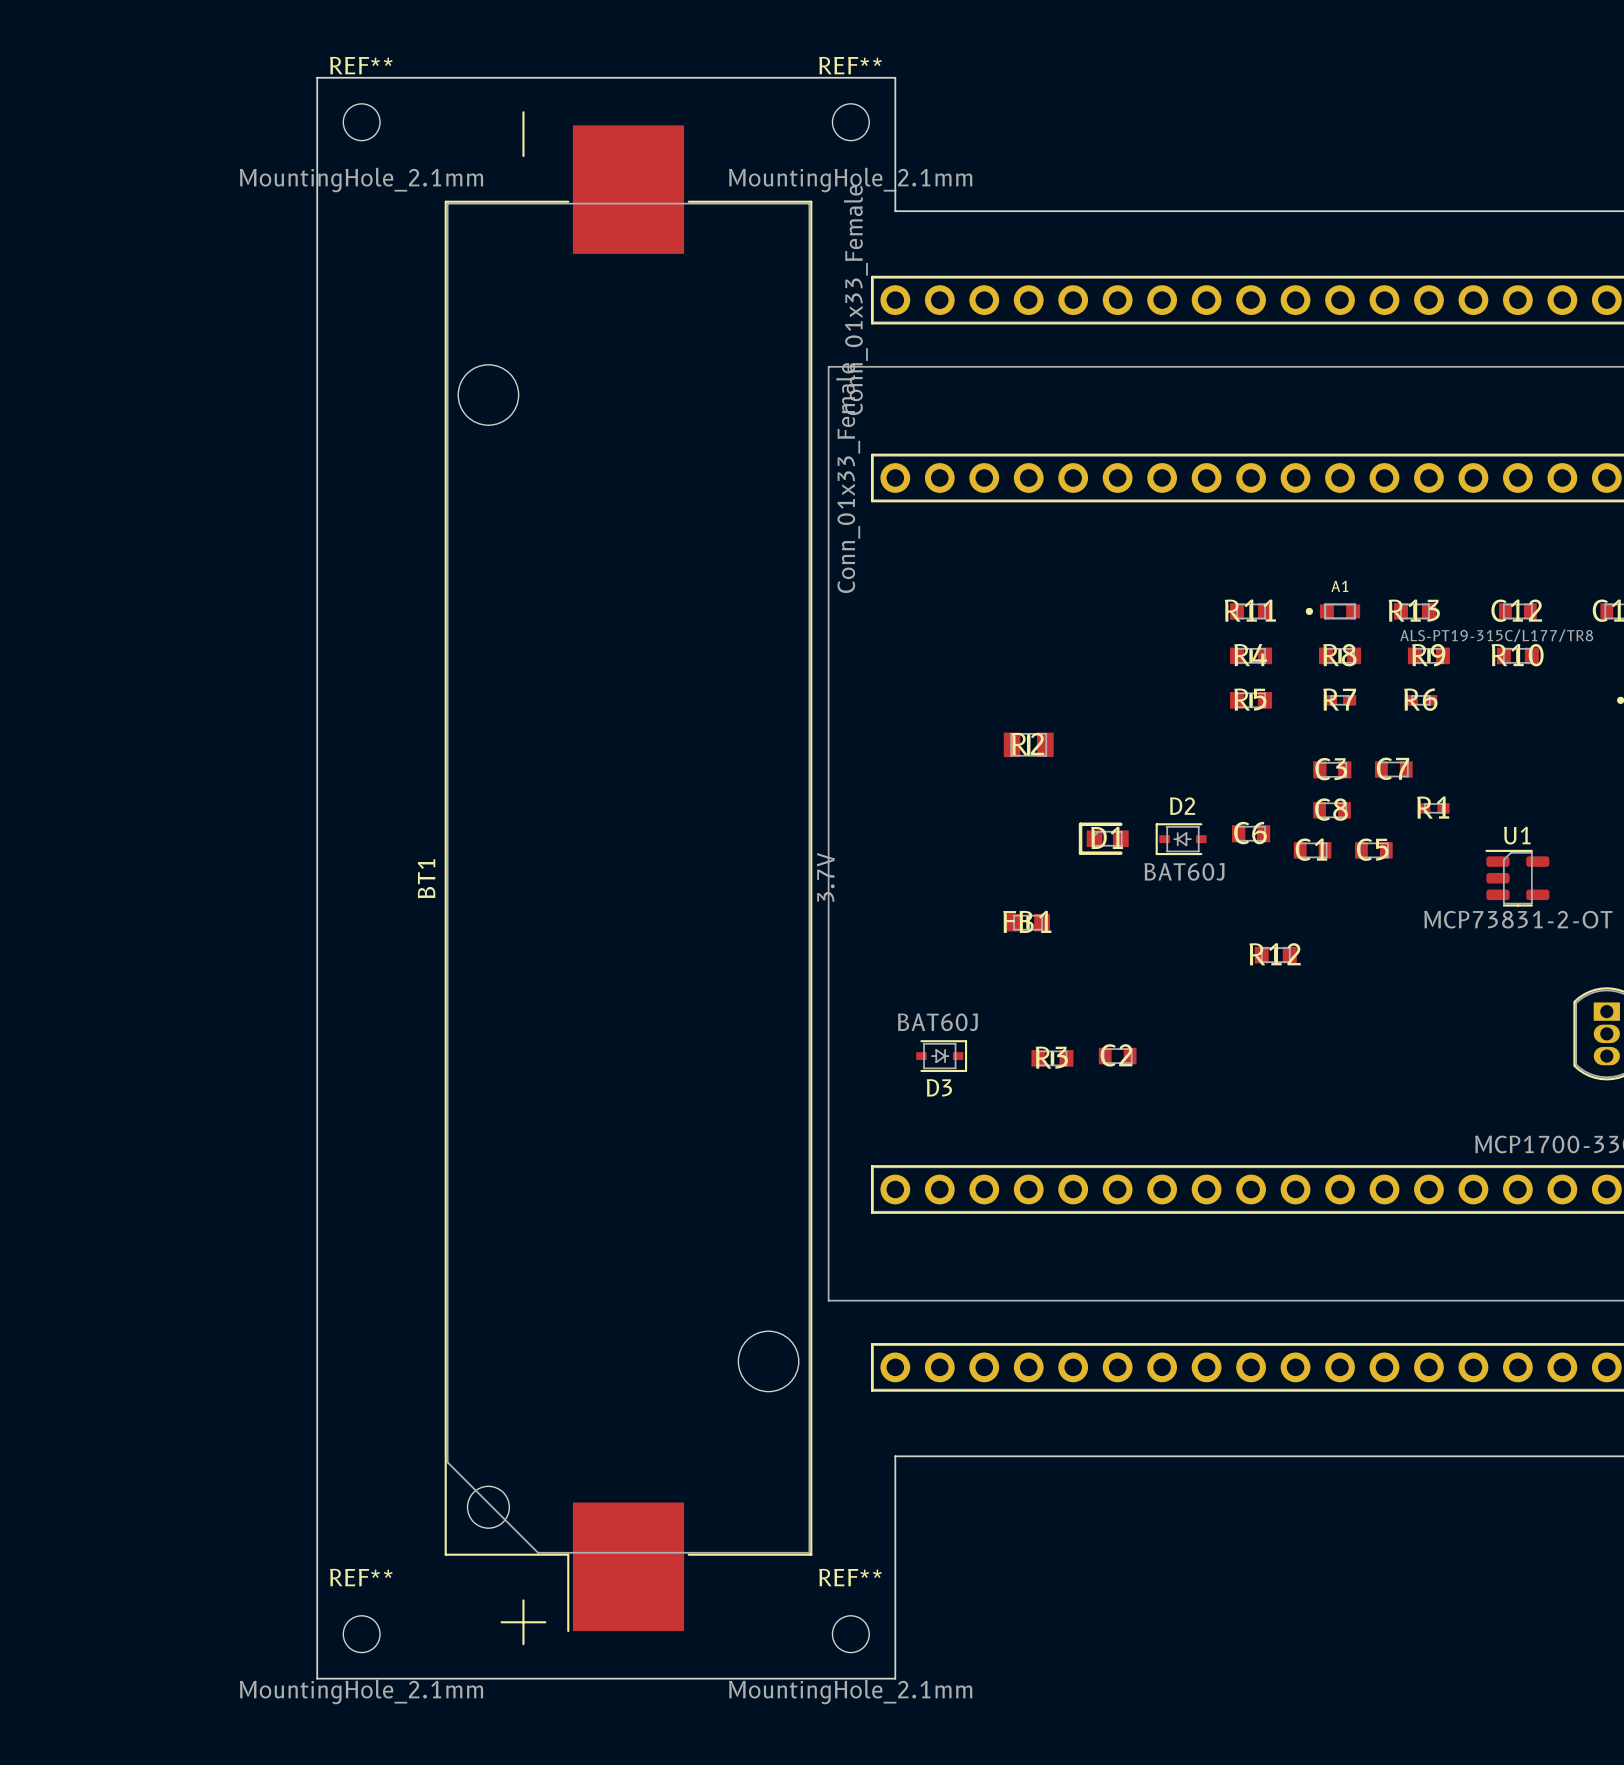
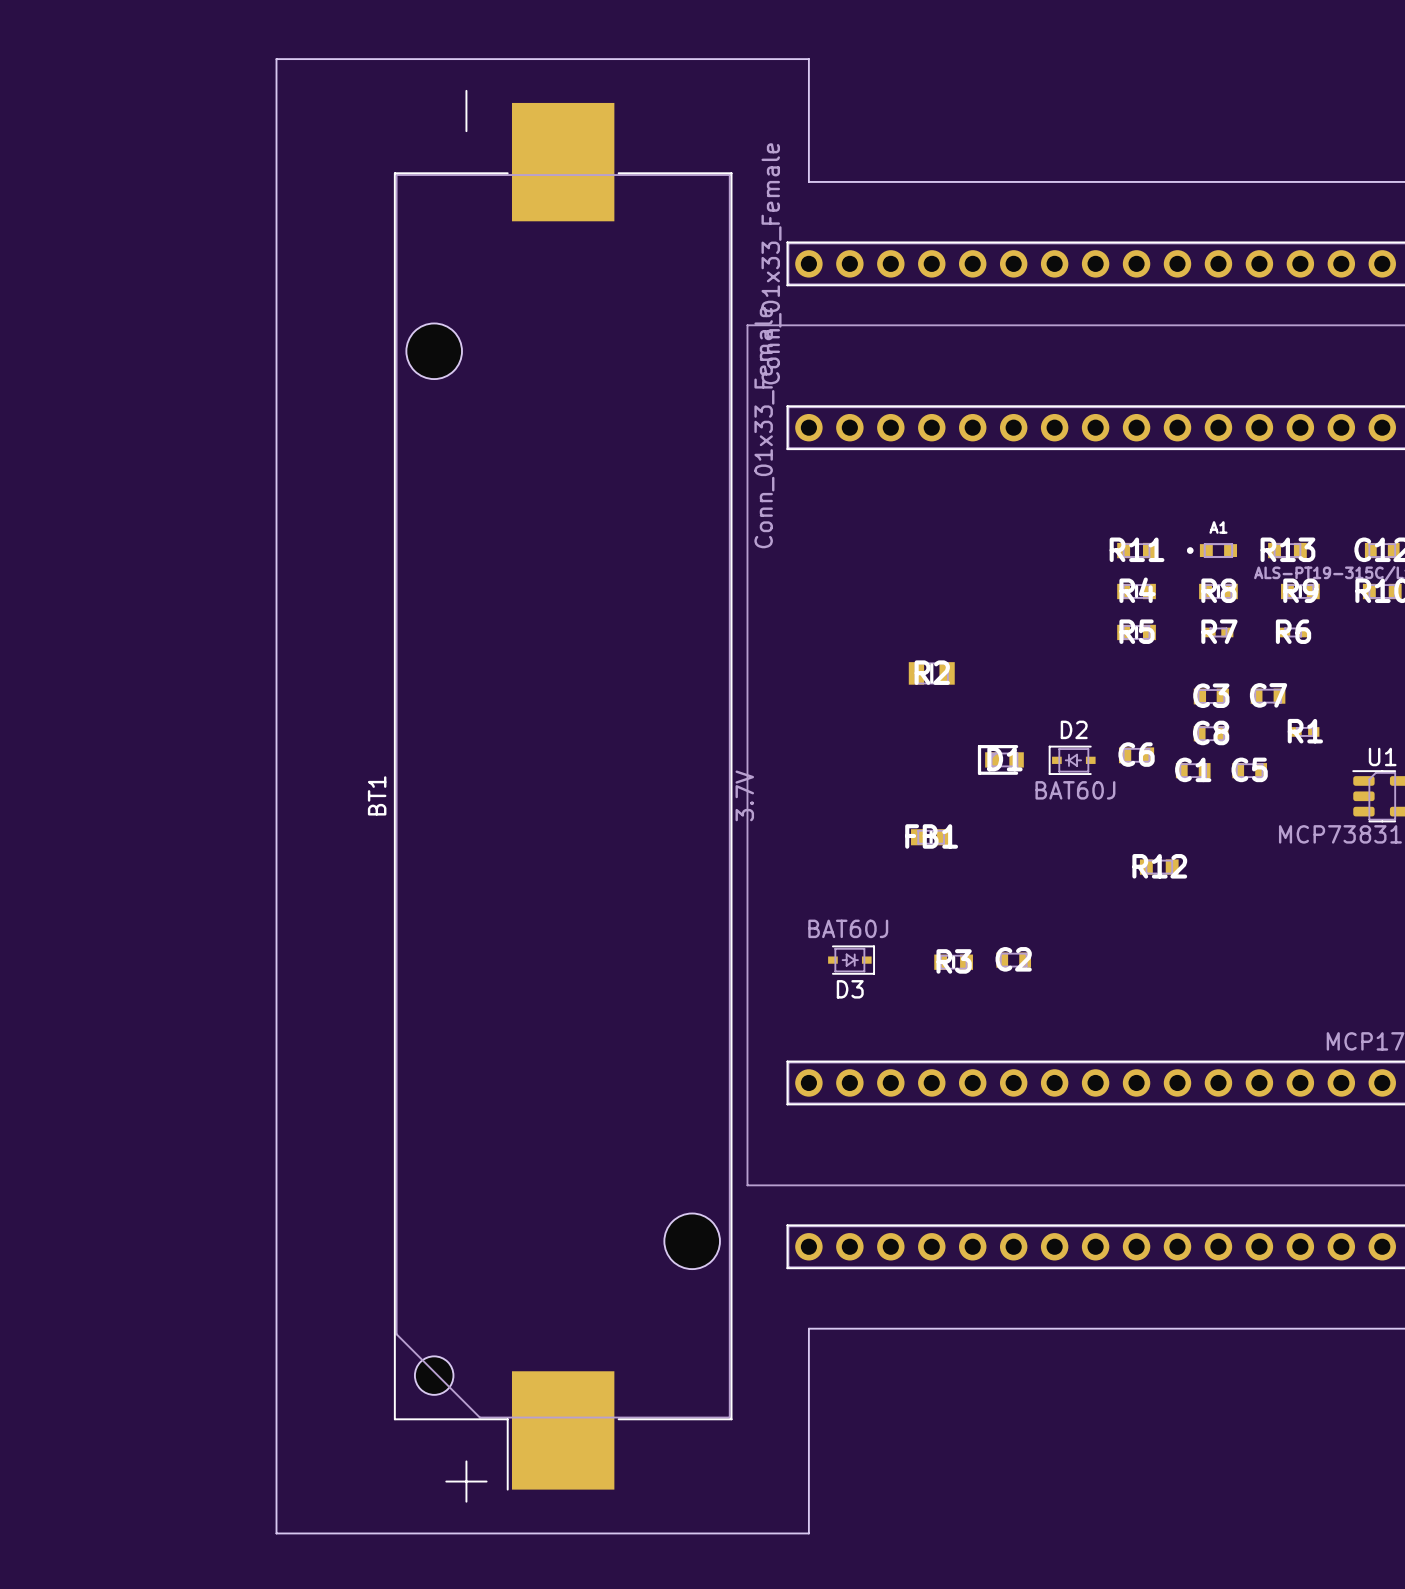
REF**: MountingHole_2.1mm (361, 122) -> none
REF**: MountingHole_2.1mm (850, 122) -> none
REF**: MountingHole_2.1mm (361, 1634) -> none
REF**: MountingHole_2.1mm (850, 1634) -> none

